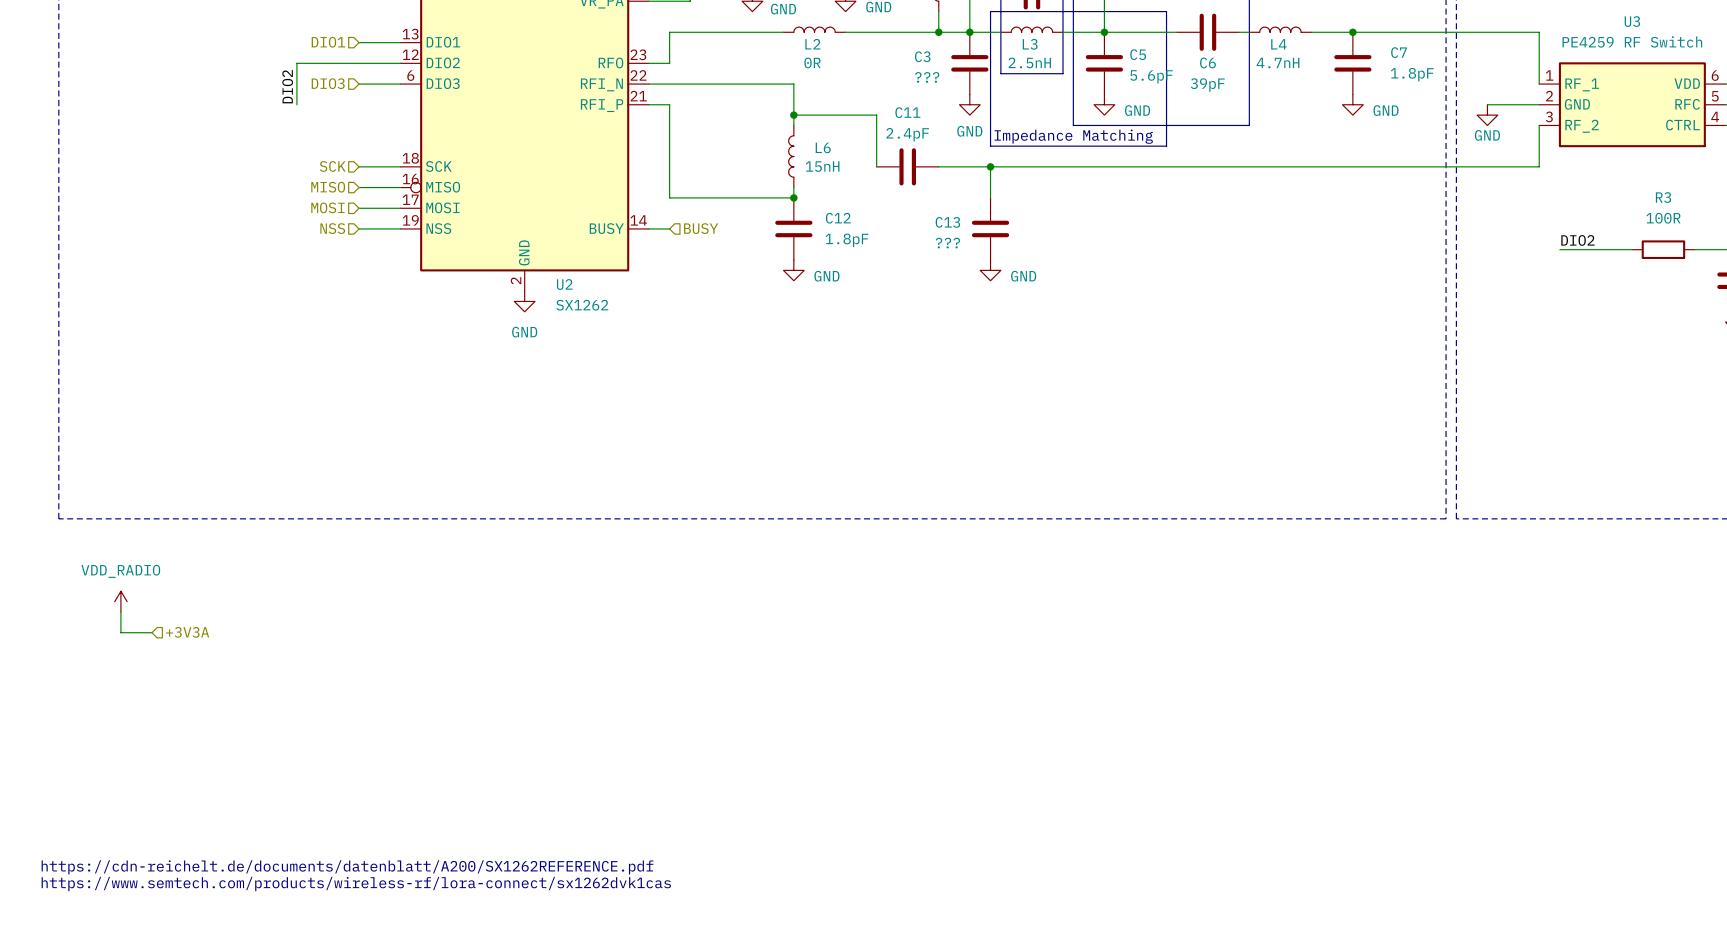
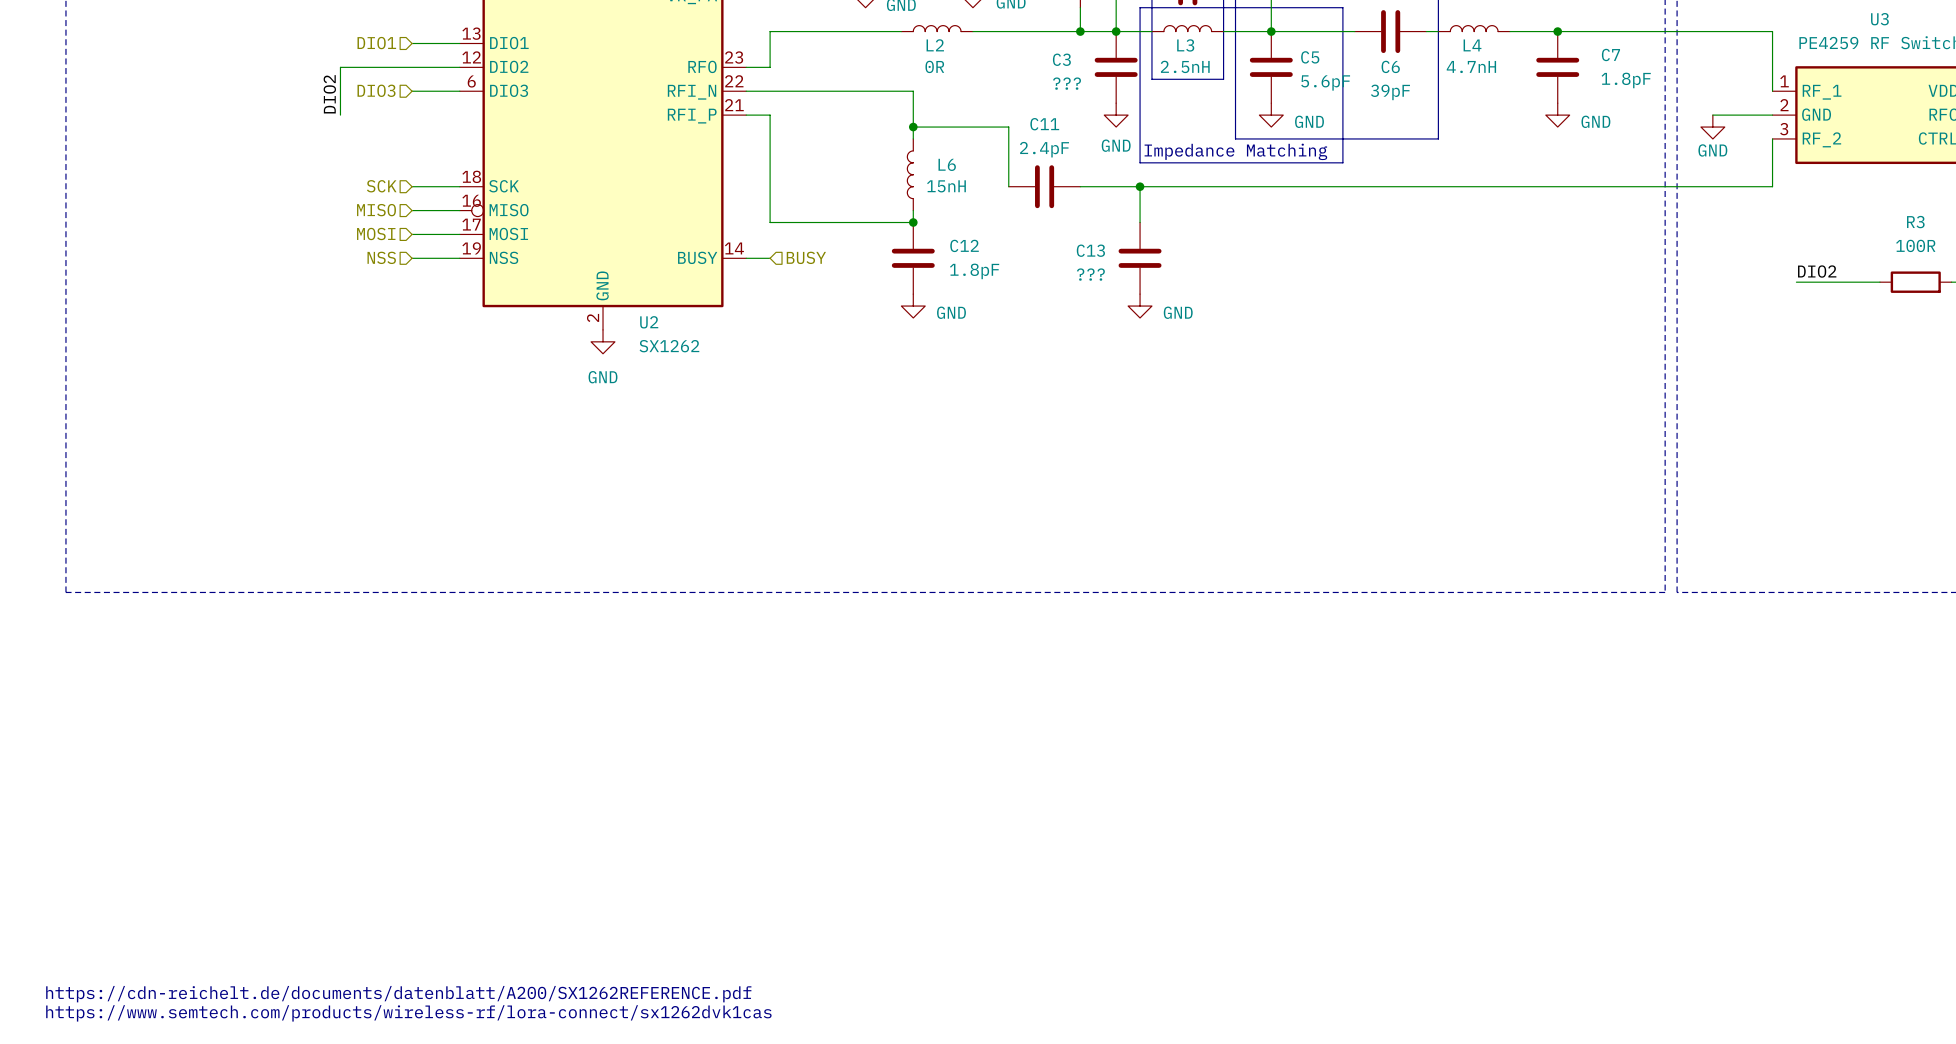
power symbol: VDD_RADIO (120, 601) -> none
wire: (120, 612) (120, 632) (151, 632) -> none
hierarchical label: +3V3A (187, 632) -> none

